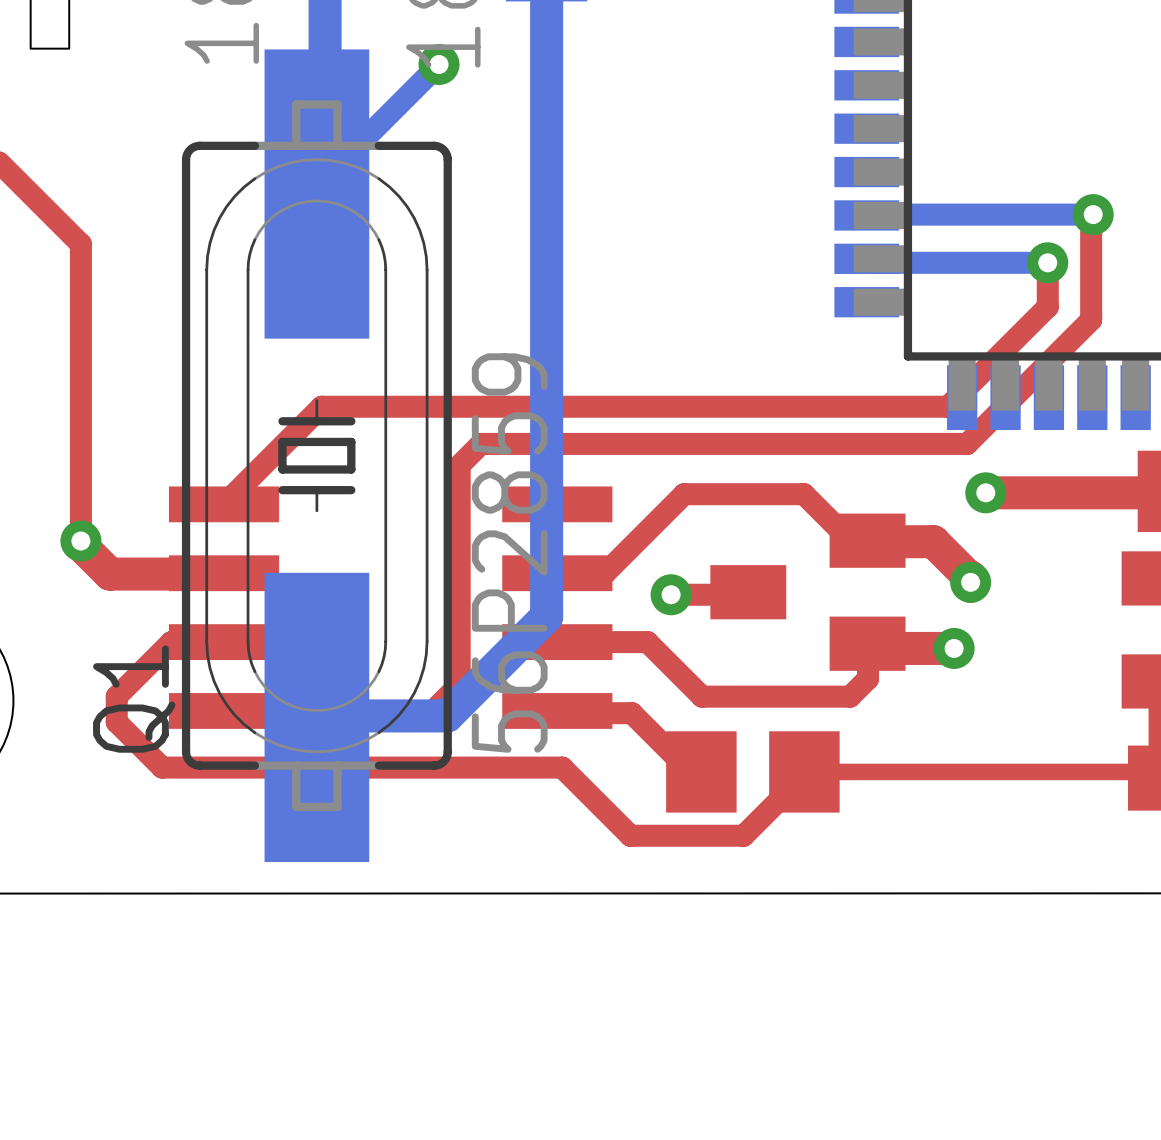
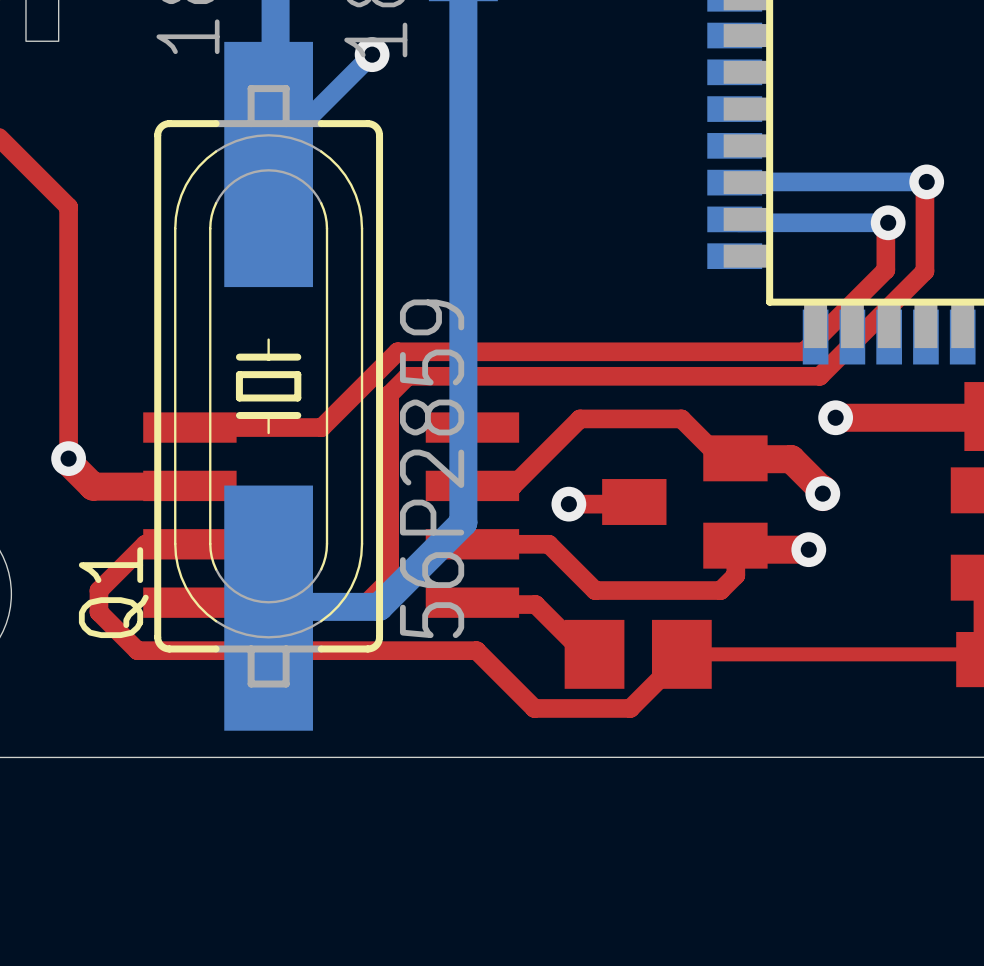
top track: (1047, 262) (1047, 306) (947, 406) (321, 406) (224, 504) -> (885, 225) (885, 270) (804, 351) (397, 351) (321, 427) (189, 427)

